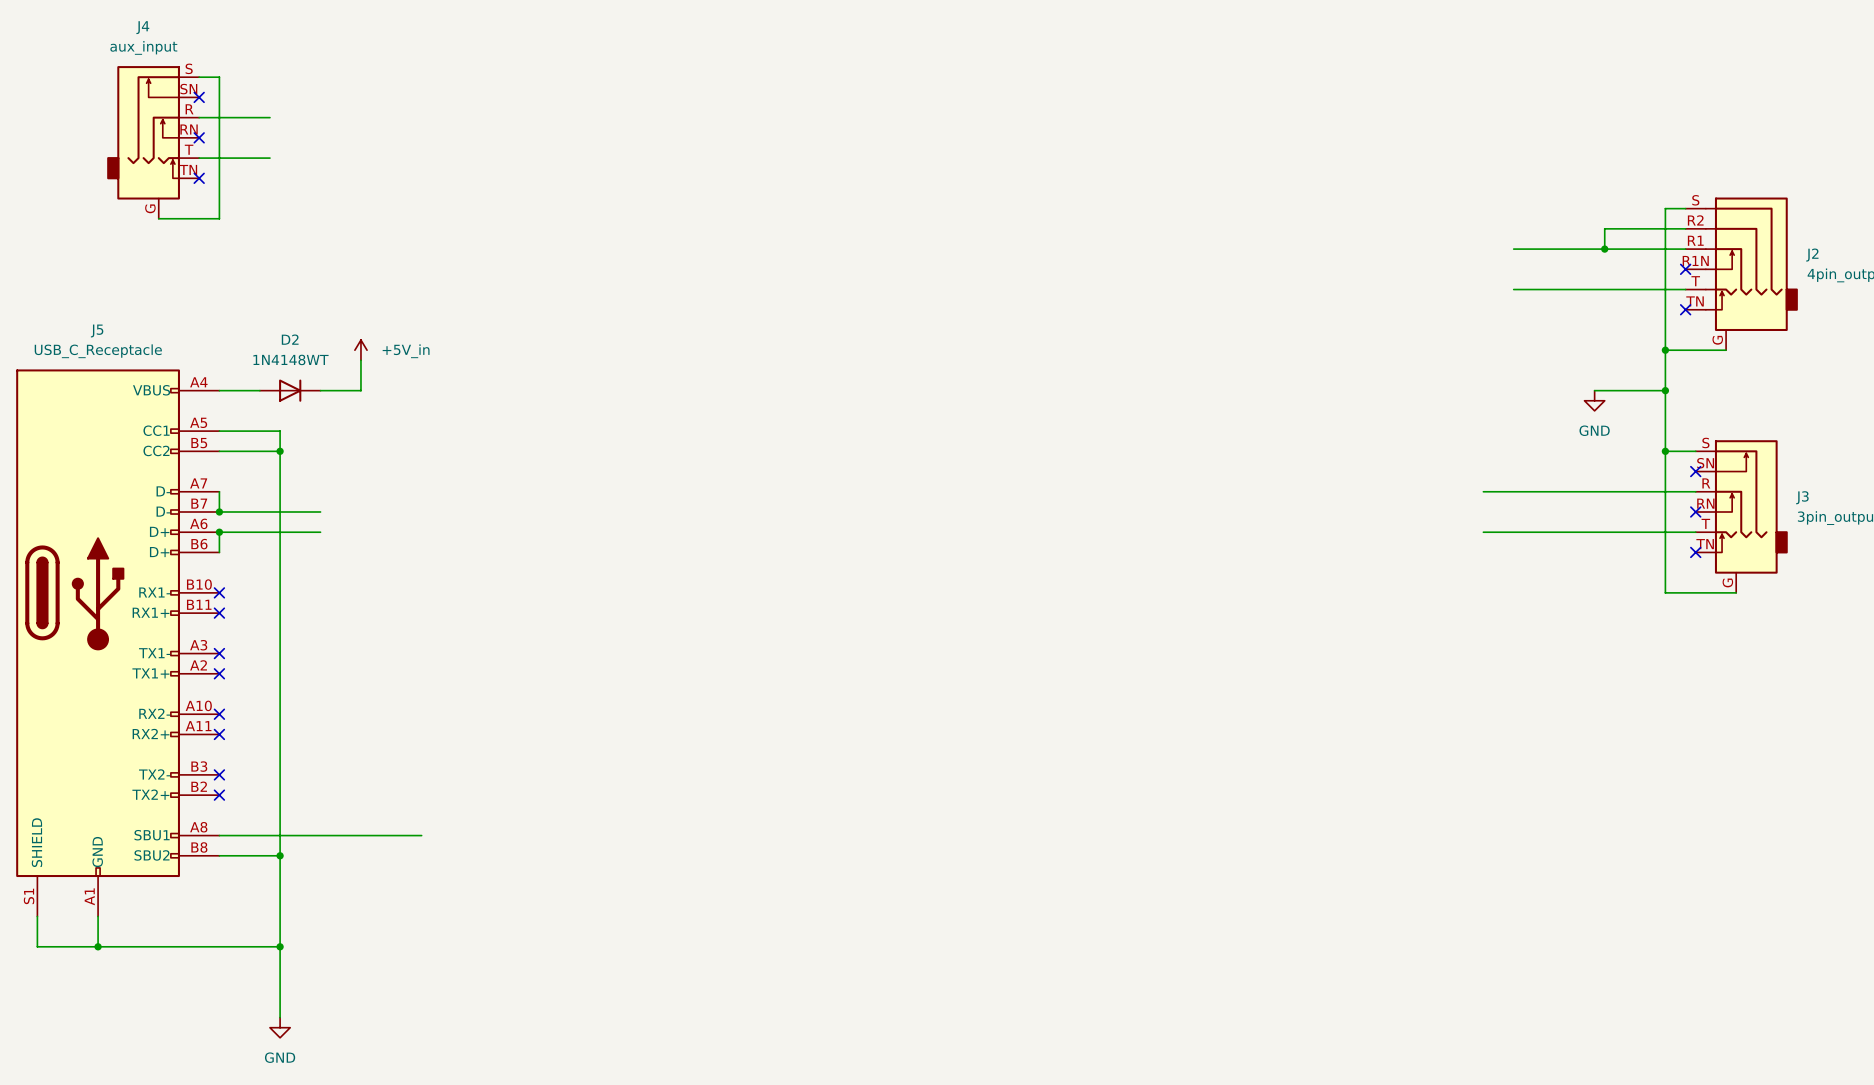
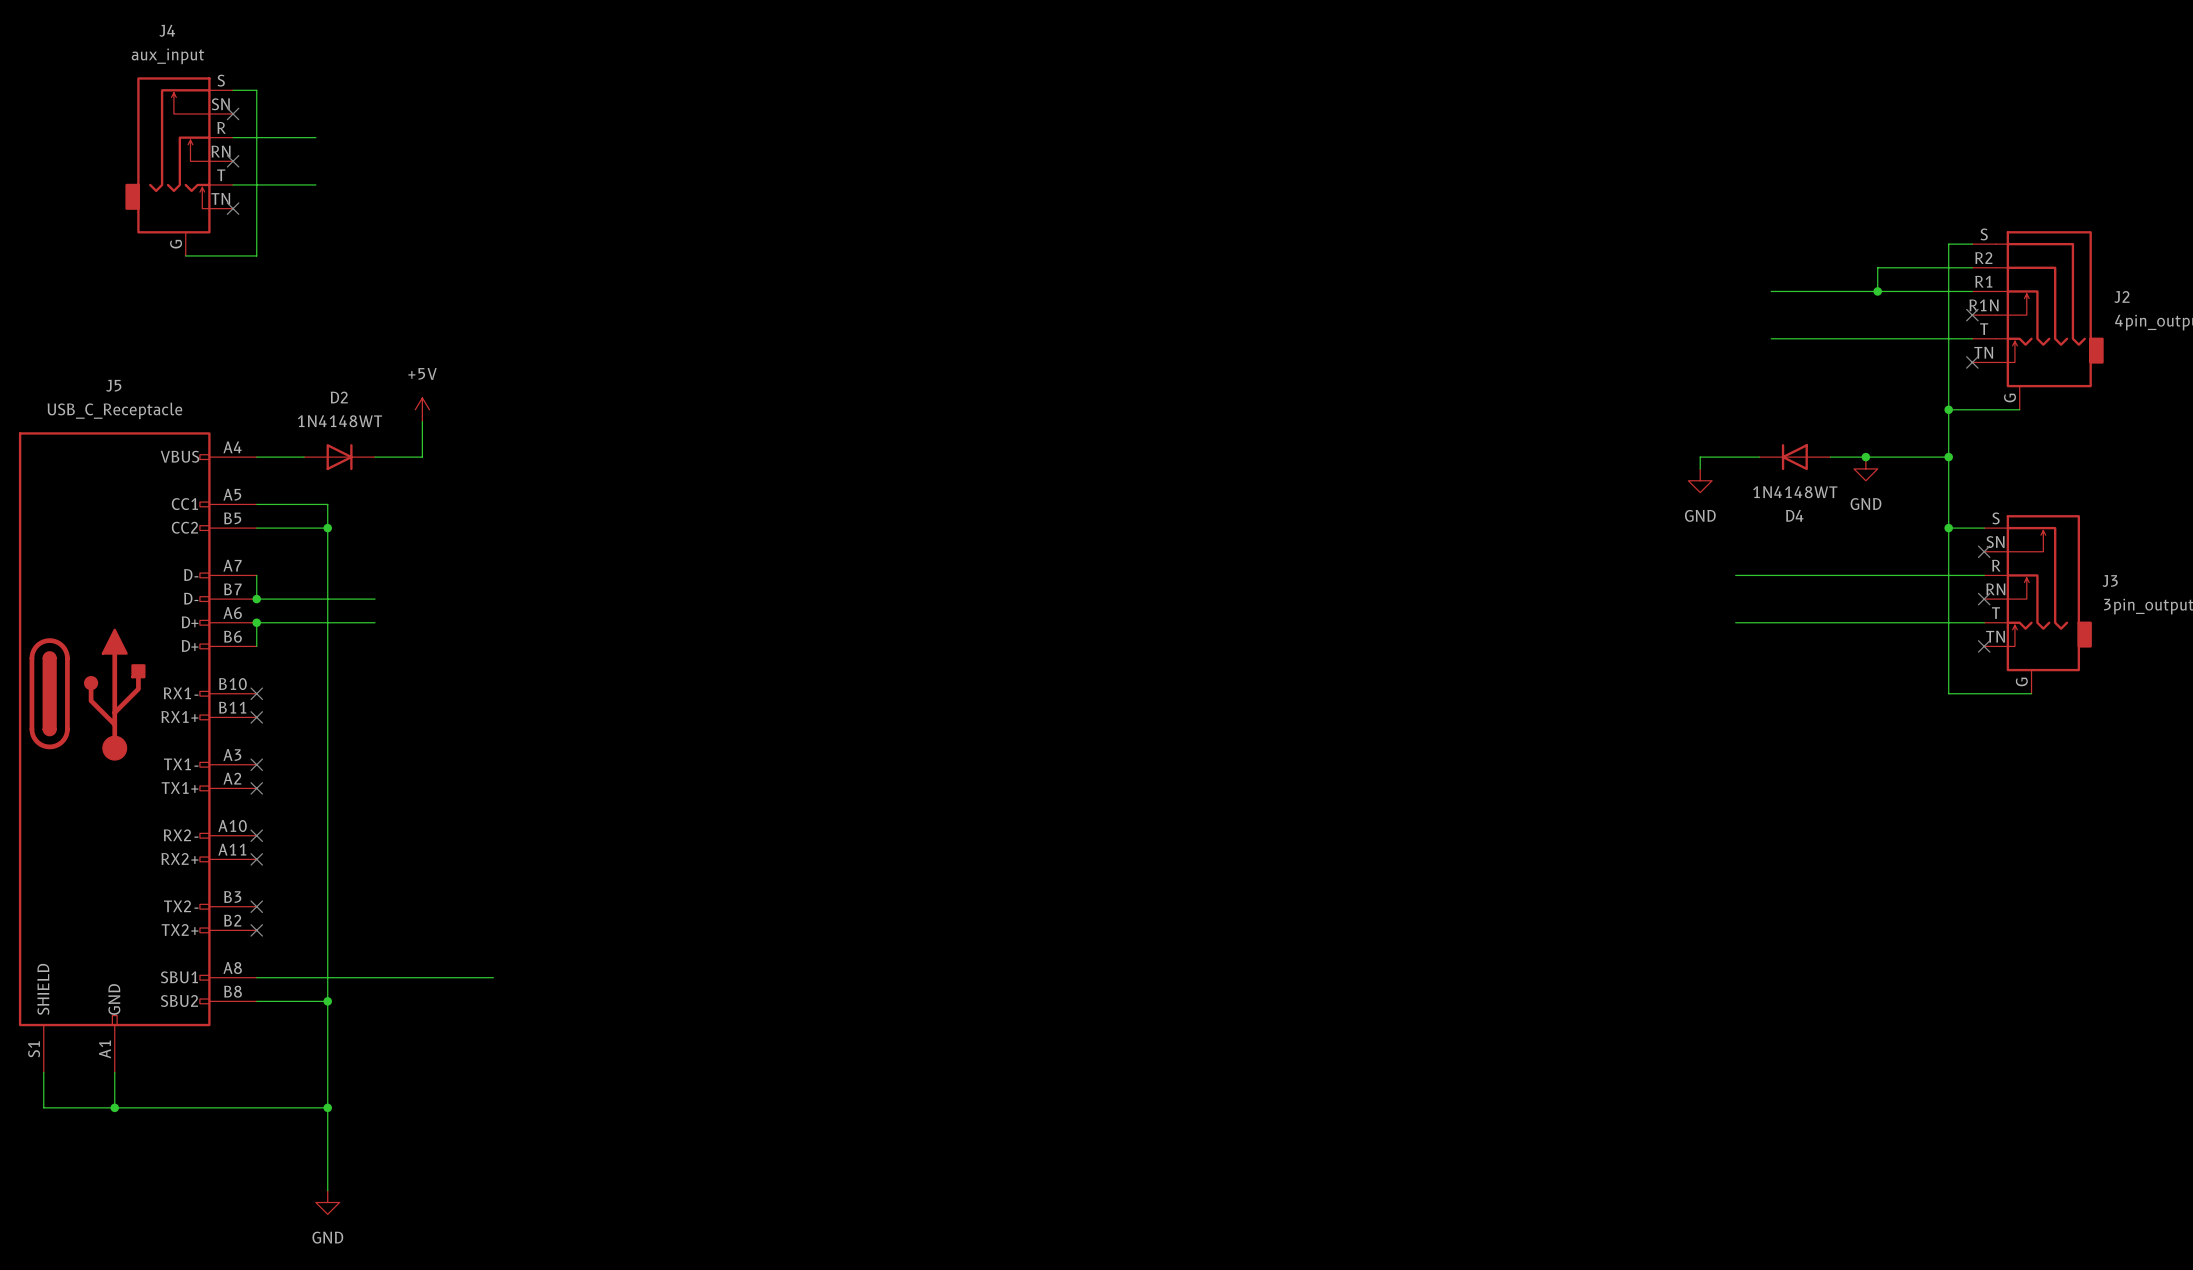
power symbol: +5V_in (360, 350) -> +5V (422, 409)
wire: none -> (1759, 457) (1700, 457) (1700, 468)
D4: none -> 1N4148WT (1794, 457)
wire: none -> (1830, 457) (1865, 457)
junction: none -> (1865, 457)
power symbol: none -> GND (1700, 480)

